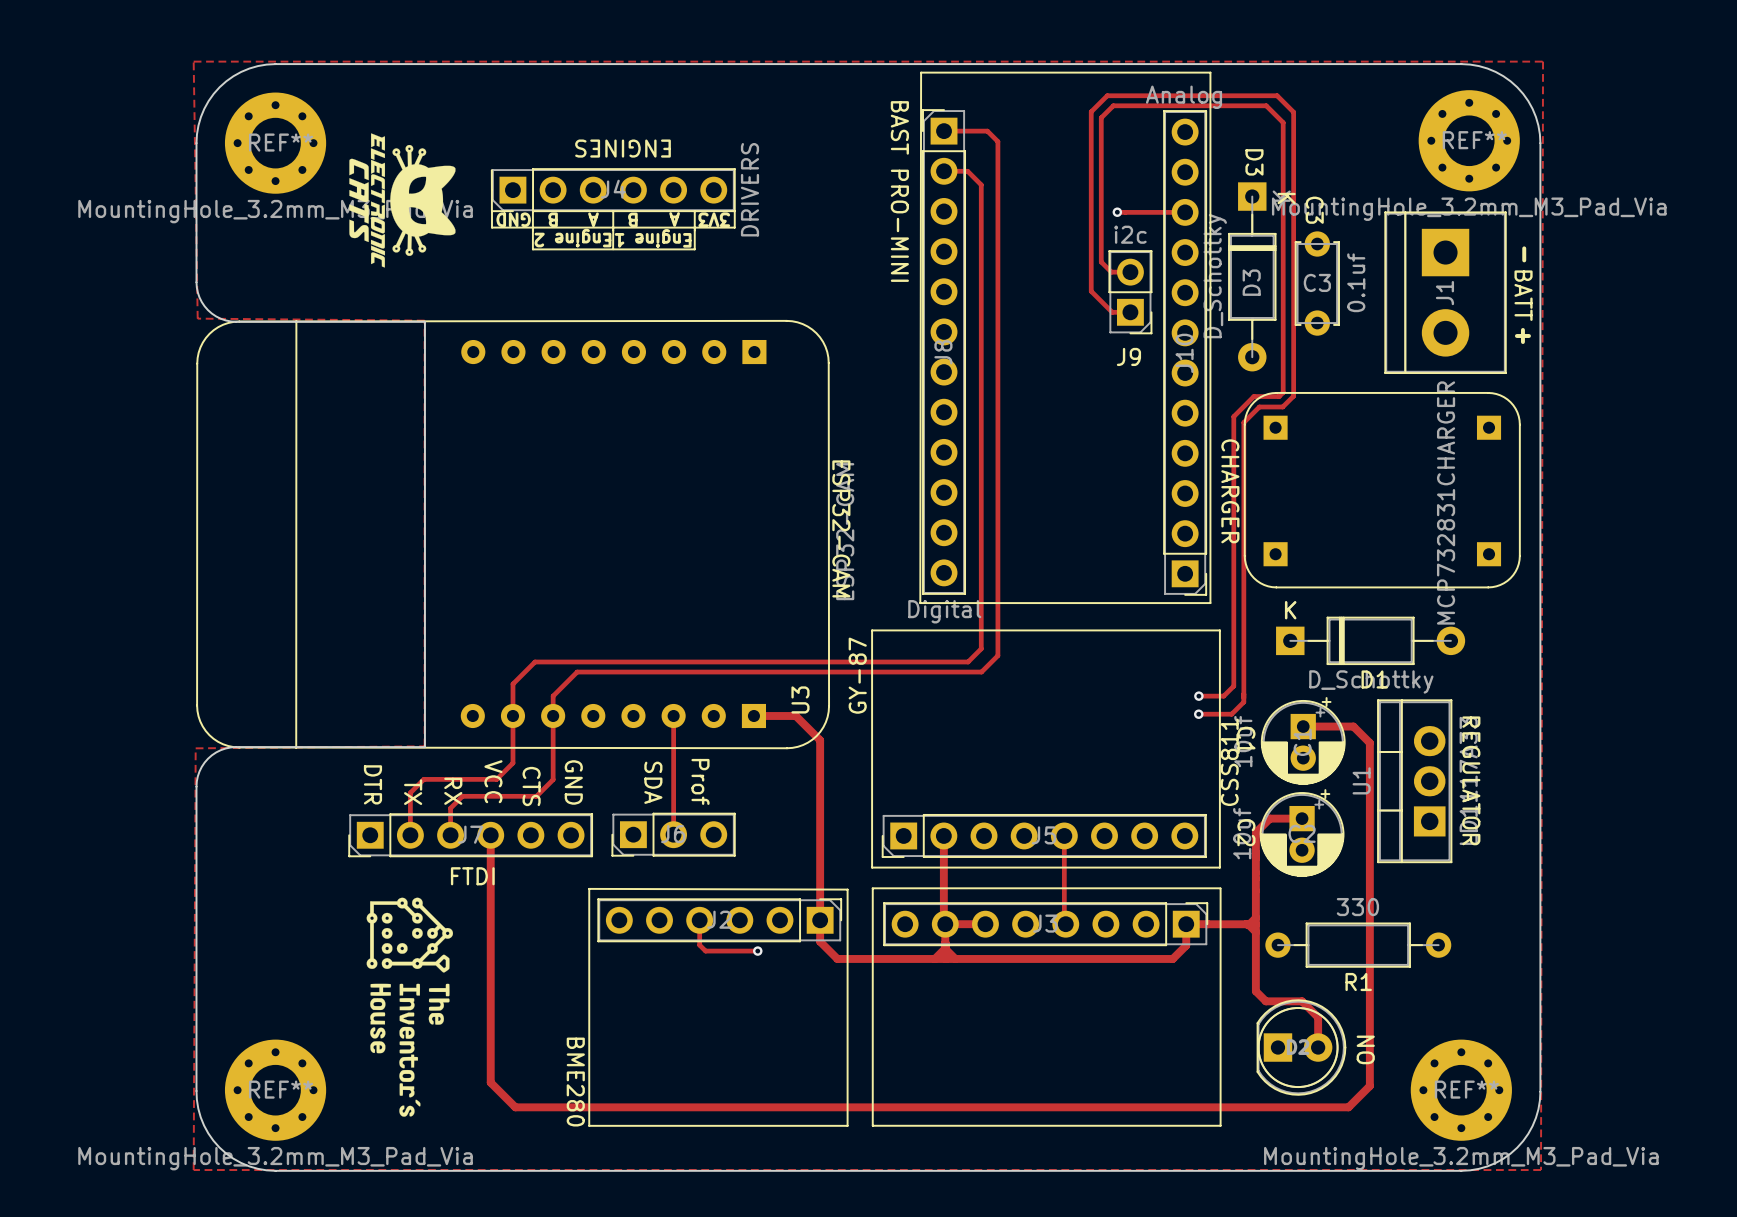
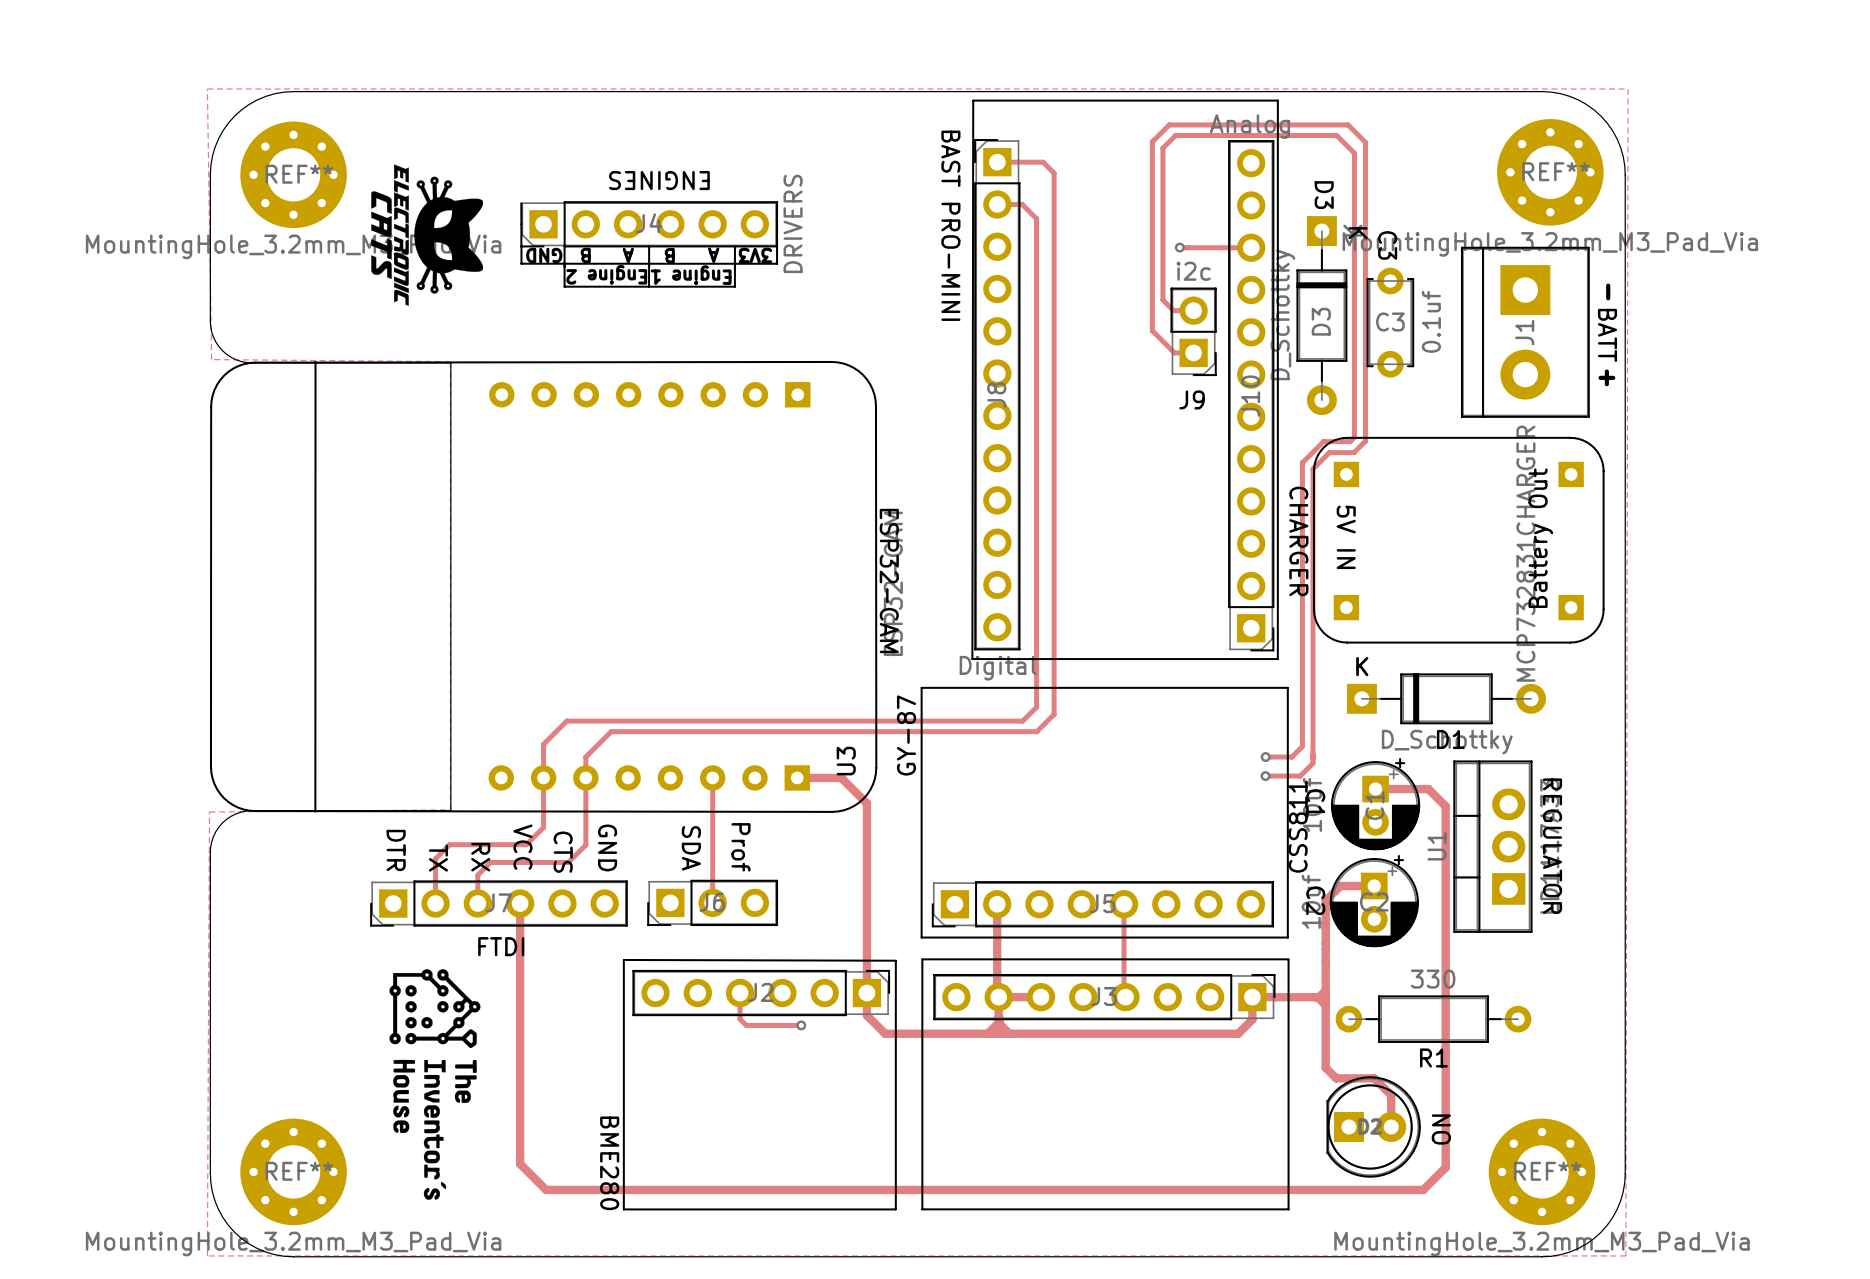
text: none -> 5V IN (1346, 537)
text: none -> Battery Out (1540, 538)

